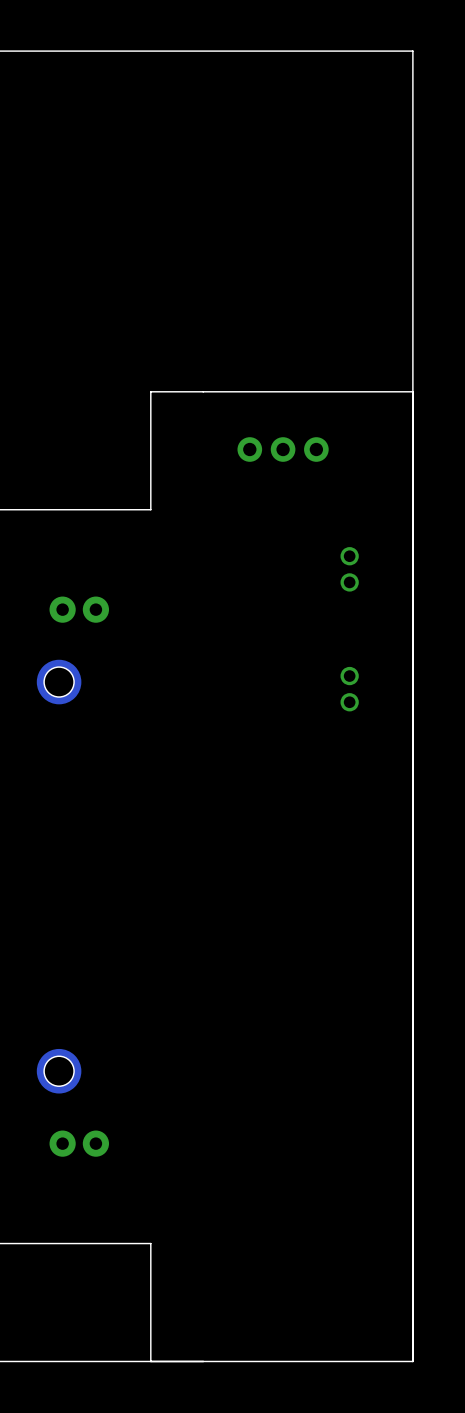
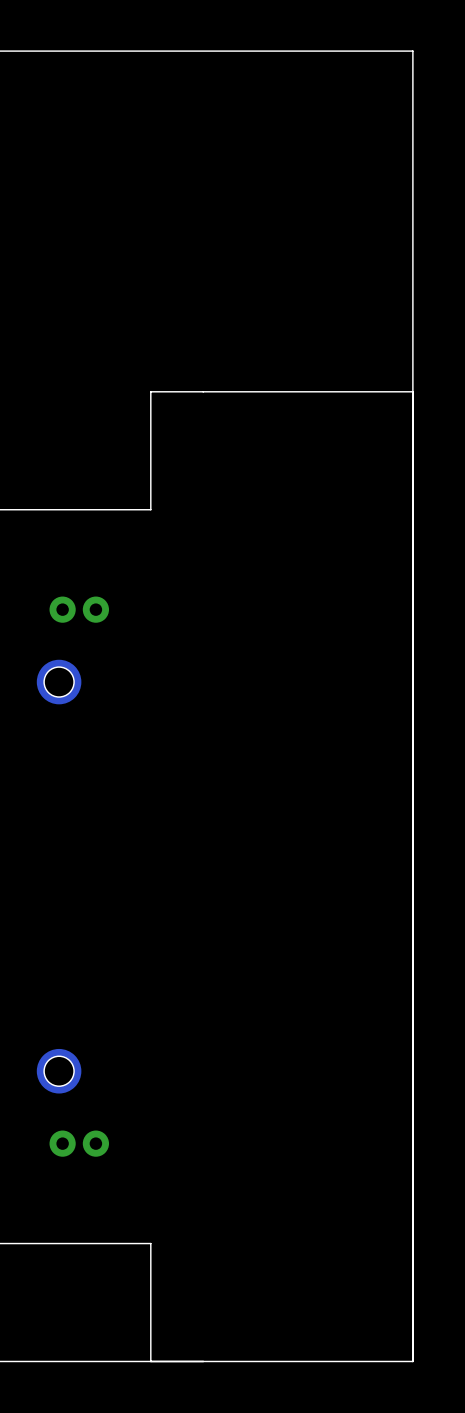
part: (283, 449) -> none
part: (349, 569) -> none
part: (349, 689) -> none

